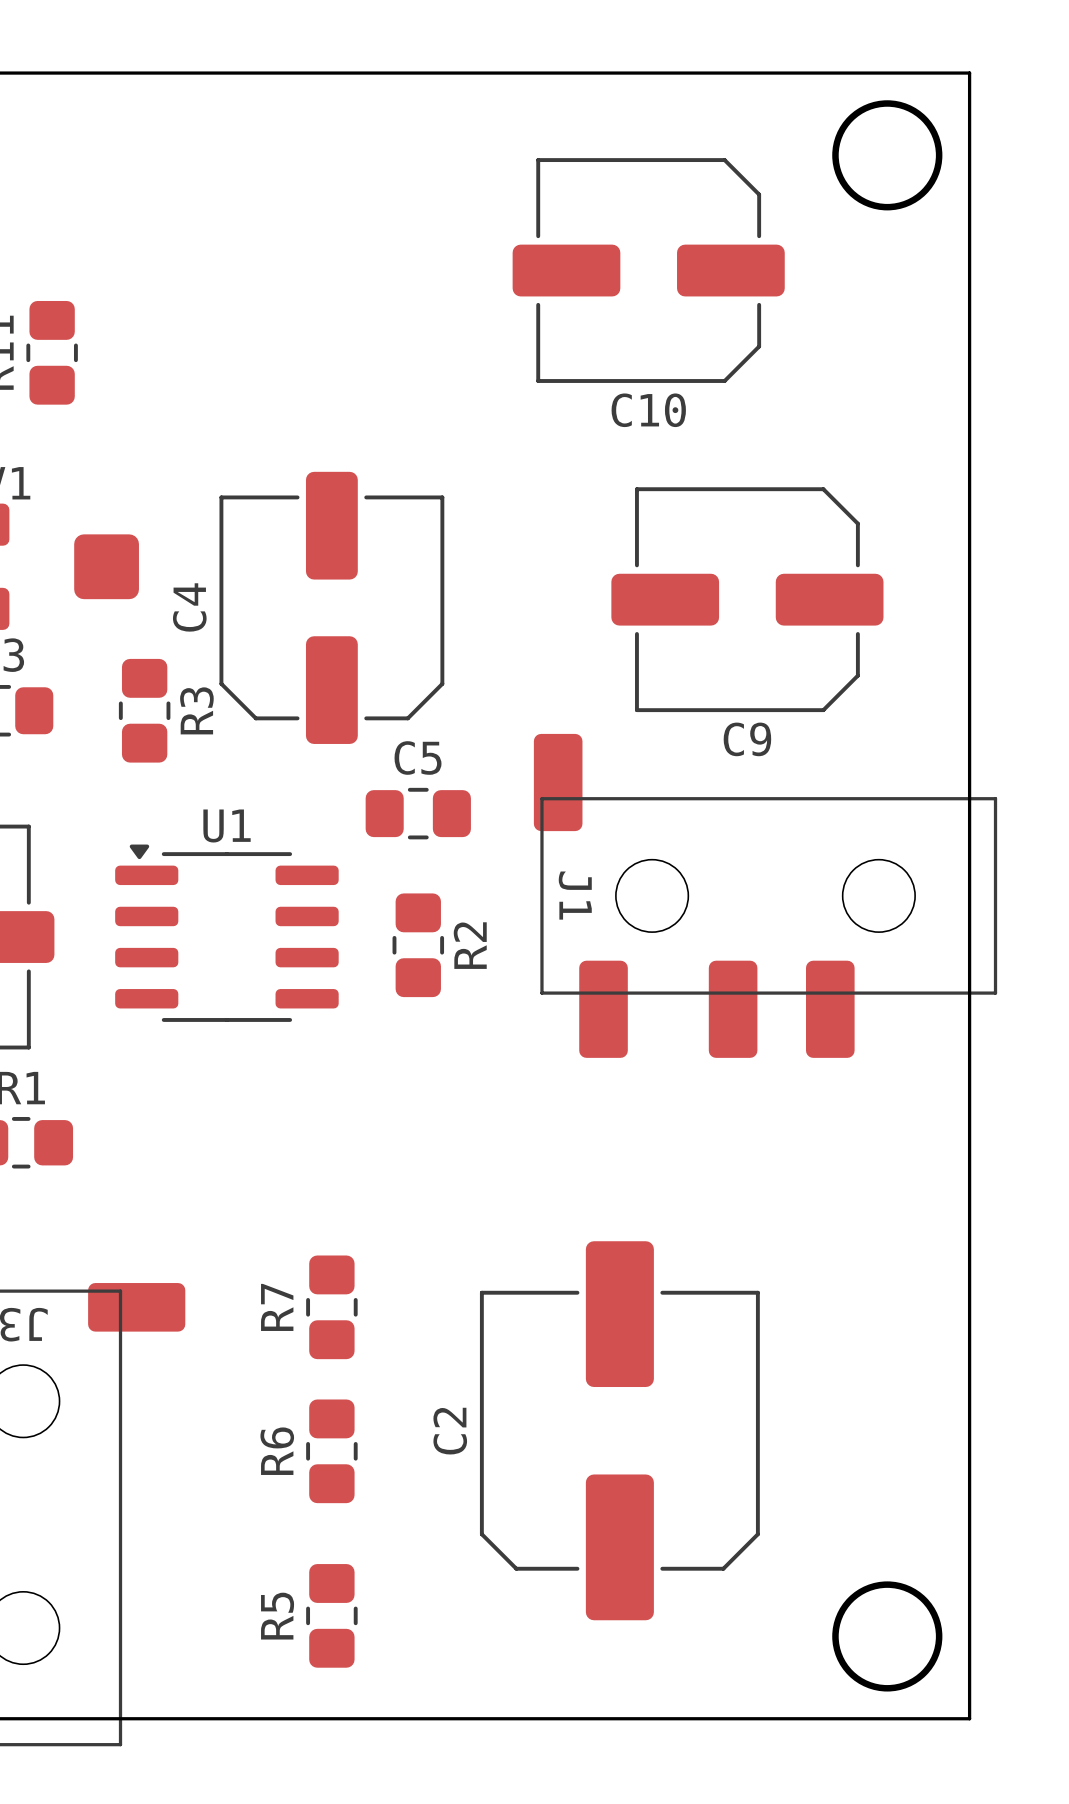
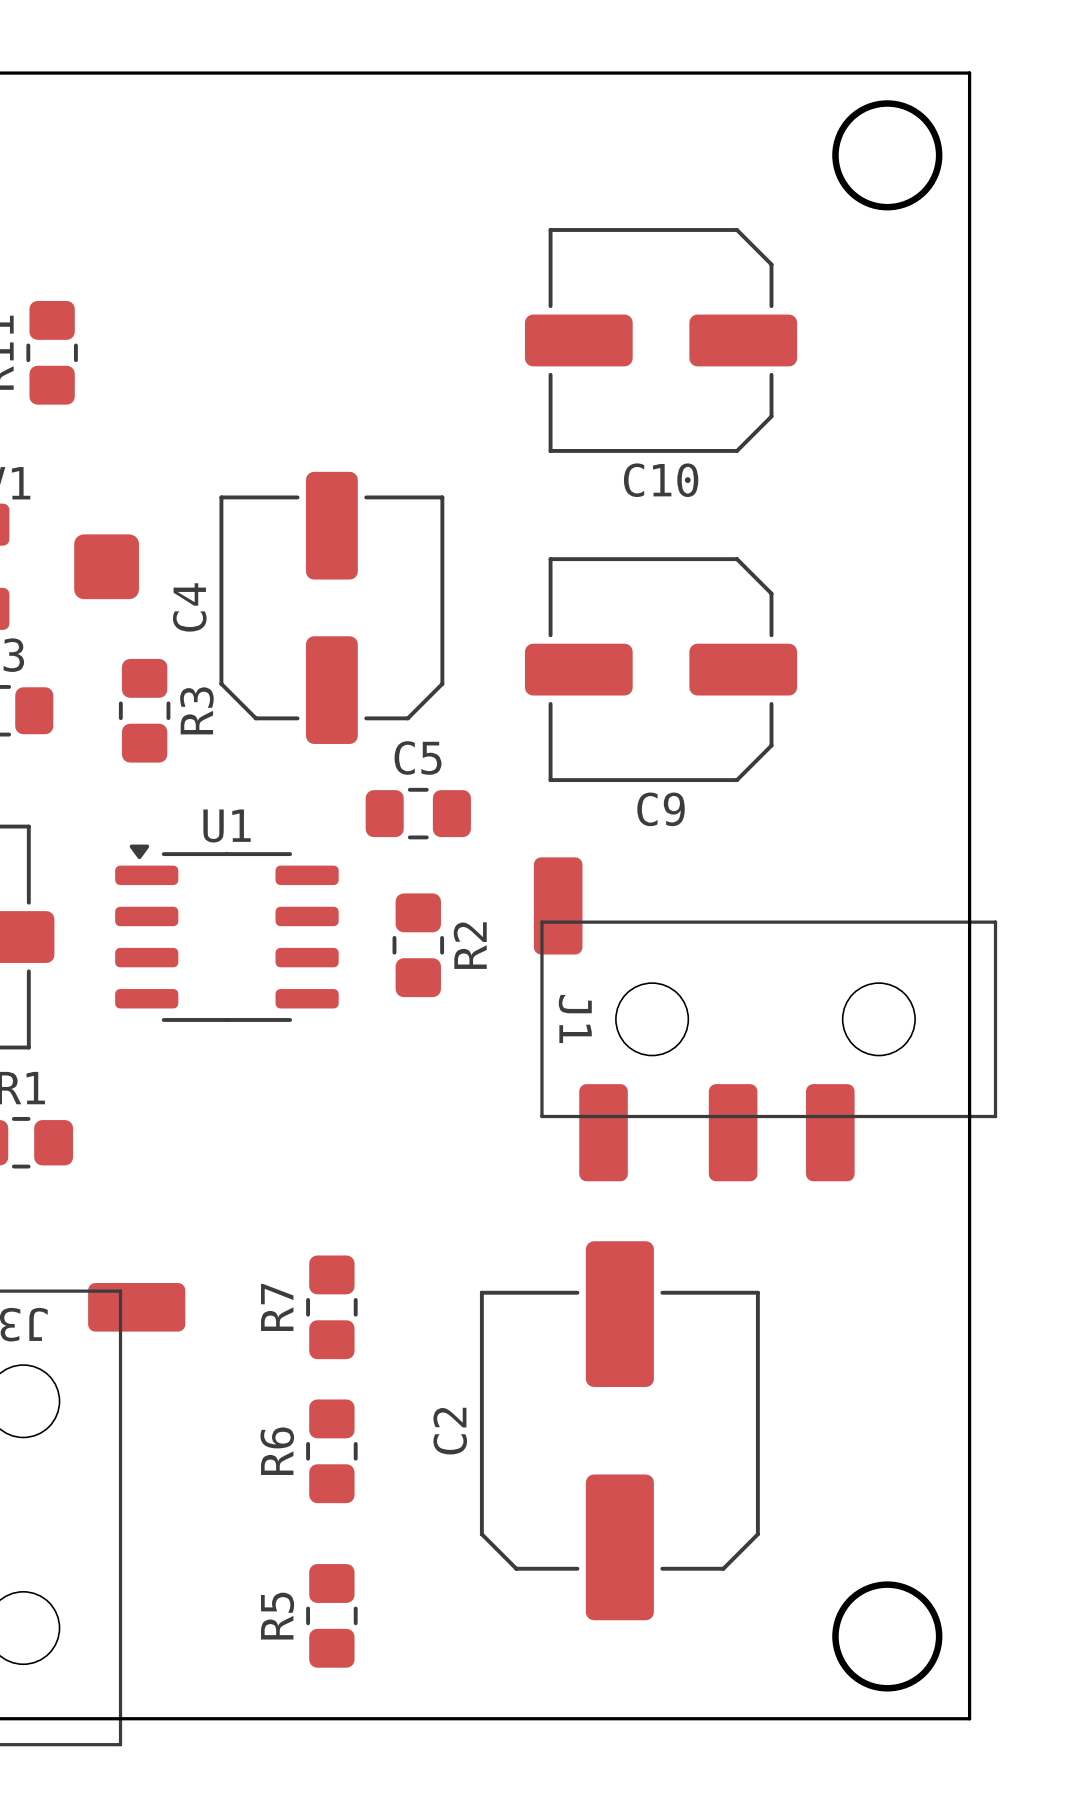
C10 position: (648, 270) -> (661, 340)
C9 position: (747, 599) -> (661, 669)
J1 position: (765, 895) -> (765, 1019)

